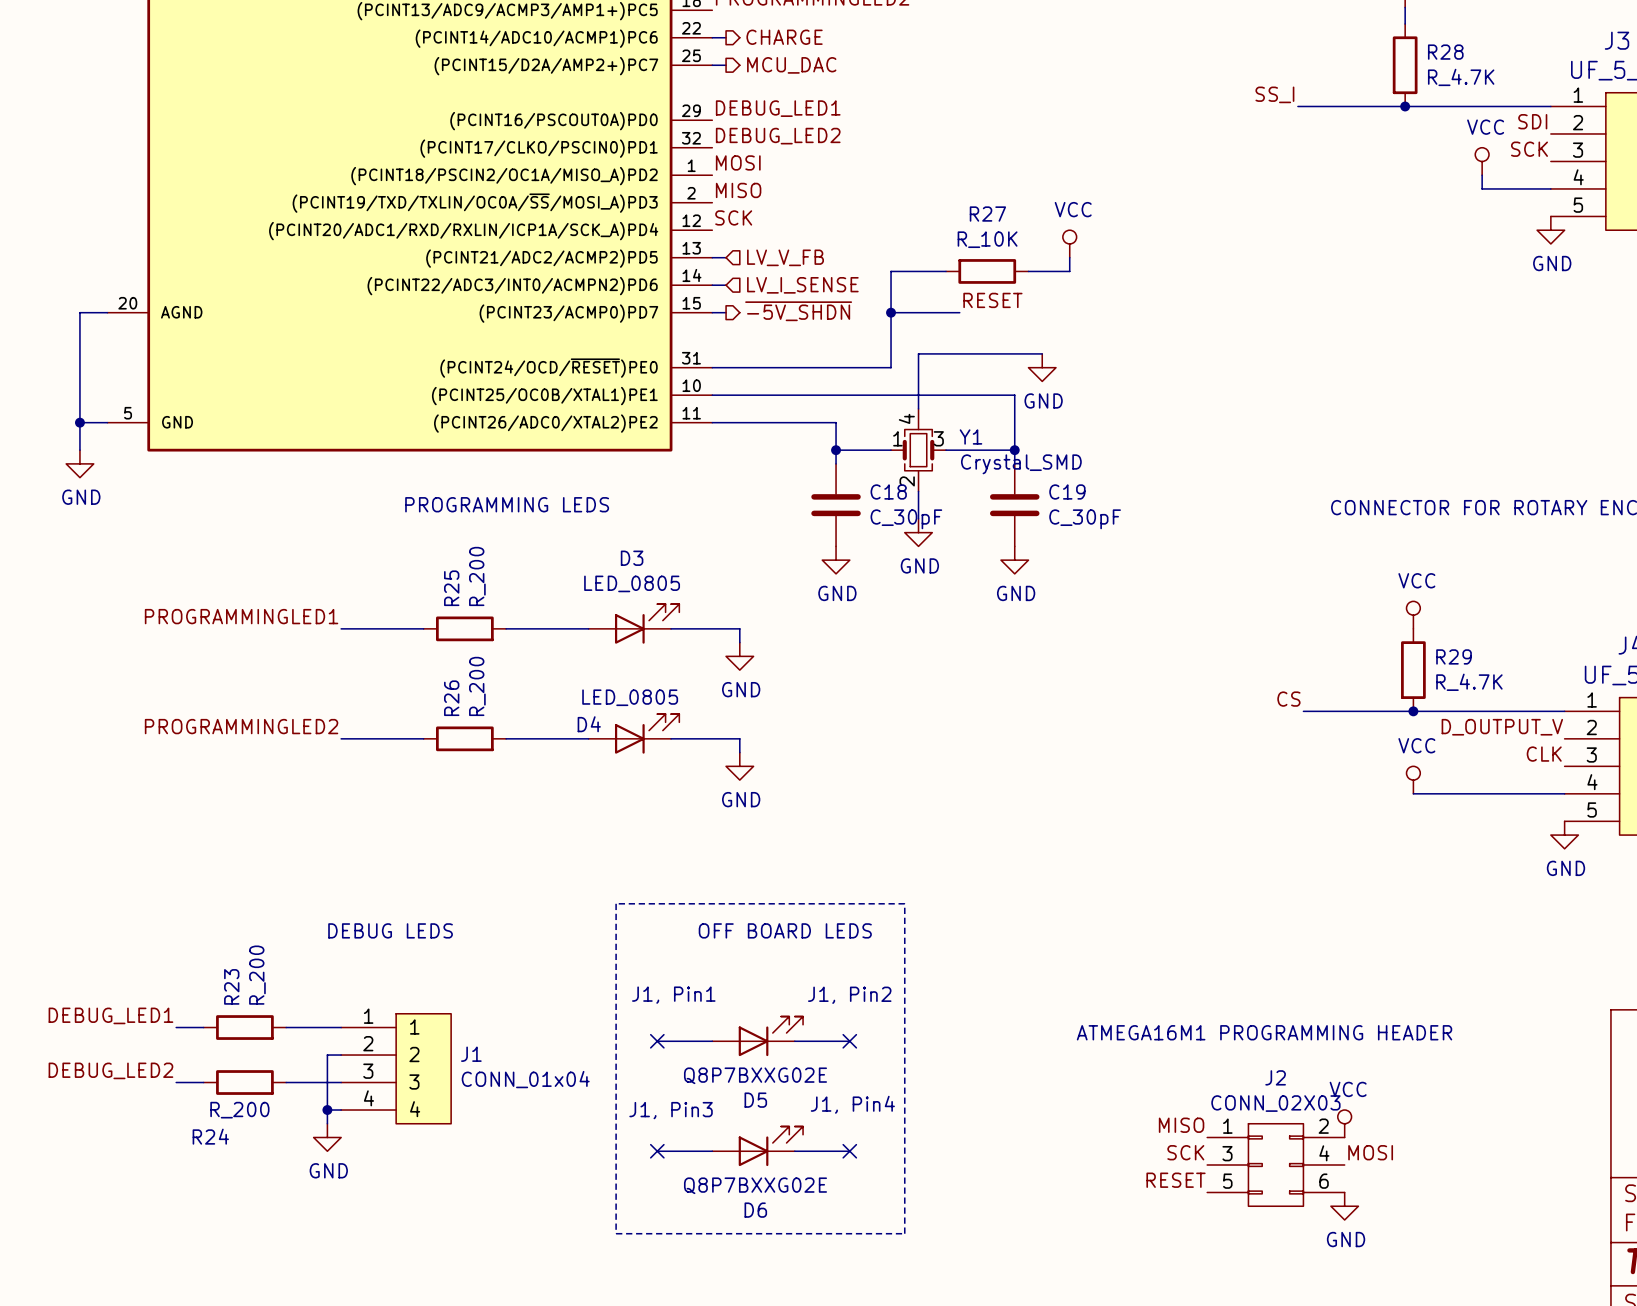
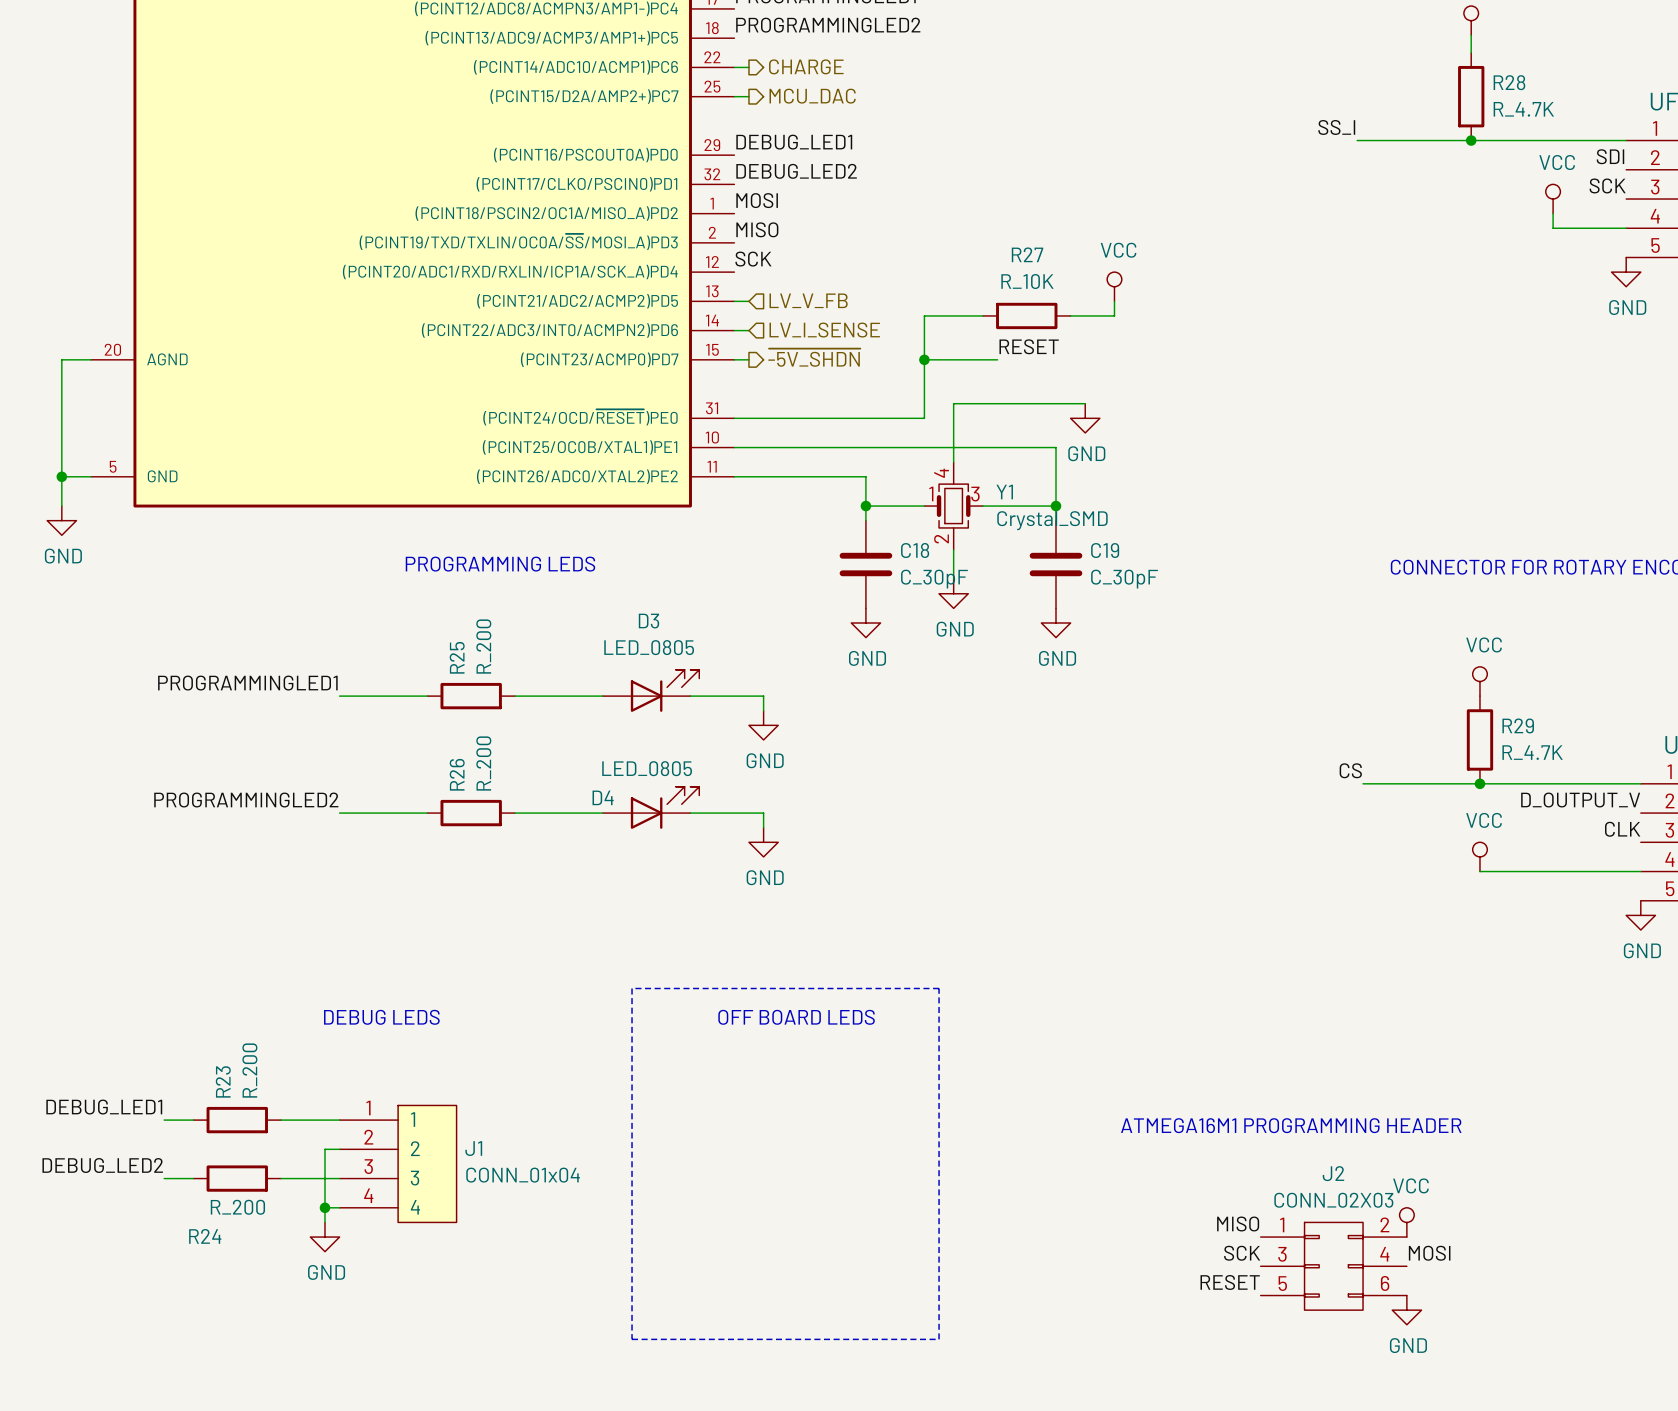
text: J1, Pin1 (673, 995) -> none
text: J1, Pin2 (849, 995) -> none
D5: Q8P7BXXG02E (757, 1036) -> none
wire: (657, 1041) (712, 1041) -> none
no-connect mark: (657, 1041) -> none
wire: (794, 1041) (849, 1041) -> none
no-connect mark: (849, 1041) -> none
text: J1, Pin4 (852, 1104) -> none
text: J1, Pin3 (671, 1110) -> none
D6: Q8P7BXXG02E (757, 1146) -> none
wire: (657, 1151) (712, 1151) -> none
no-connect mark: (657, 1151) -> none
wire: (794, 1151) (849, 1151) -> none
no-connect mark: (849, 1151) -> none

